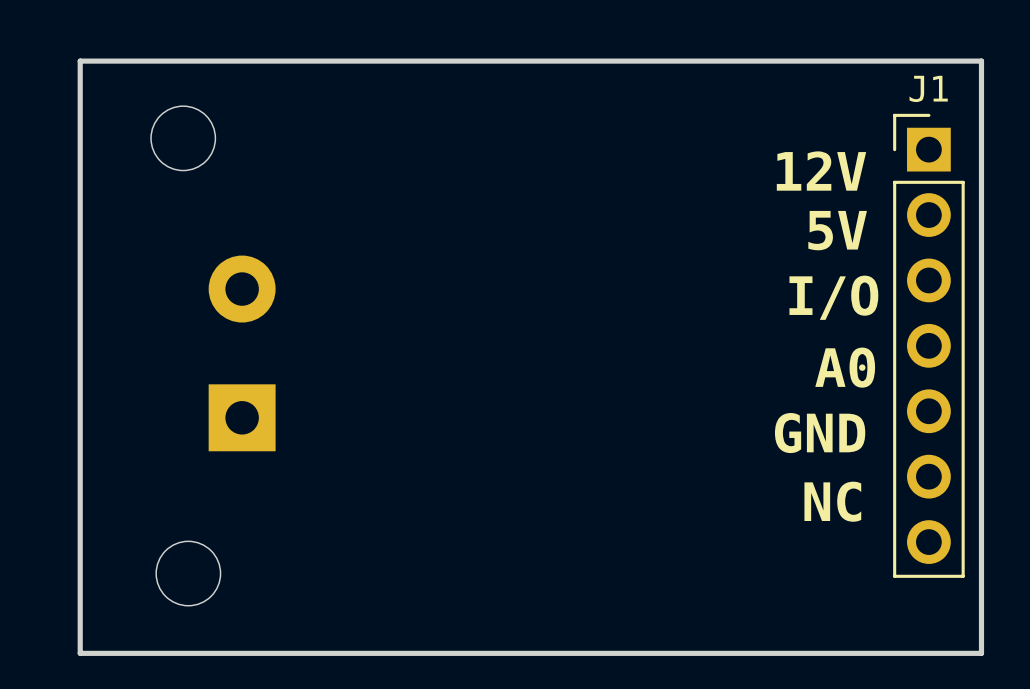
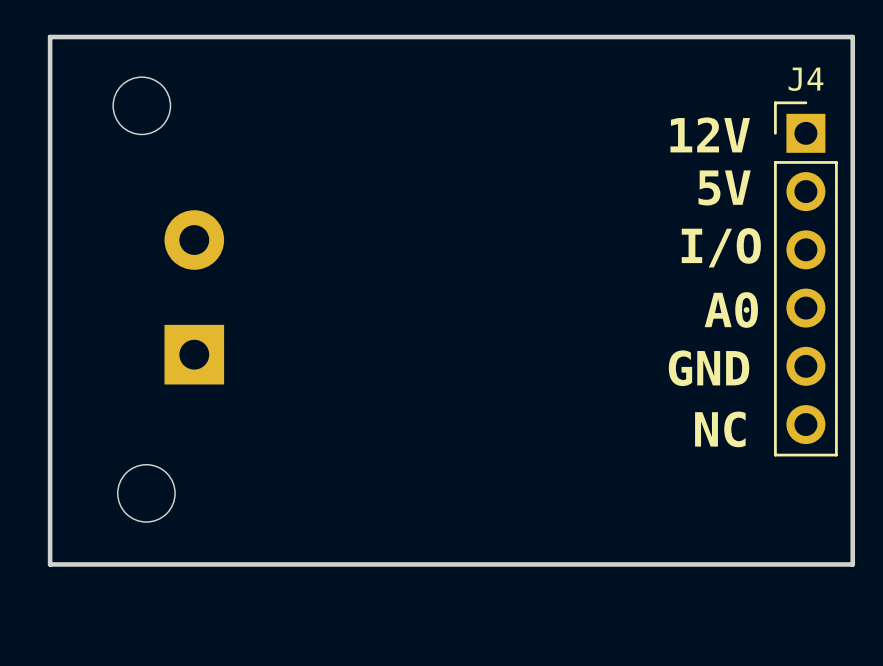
J4: none -> (805, 278)
J1: (928, 345) -> none

